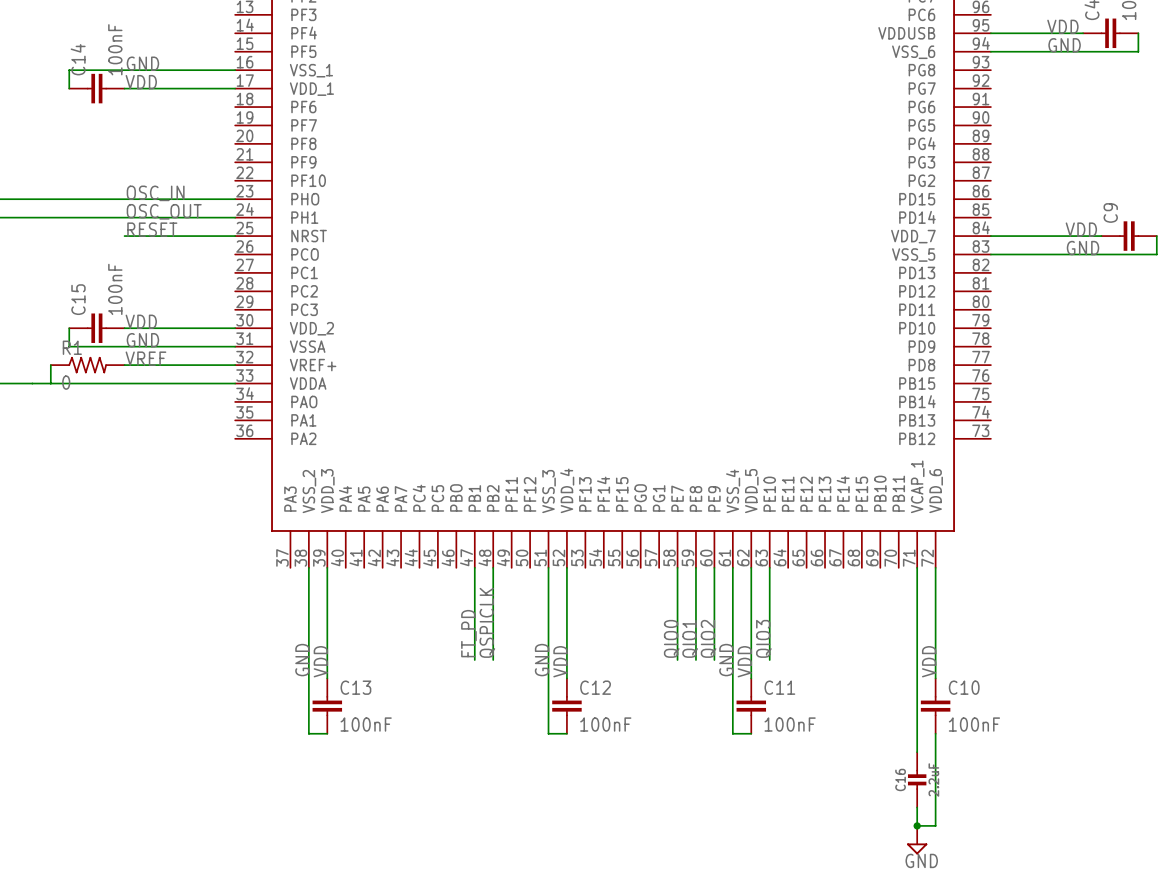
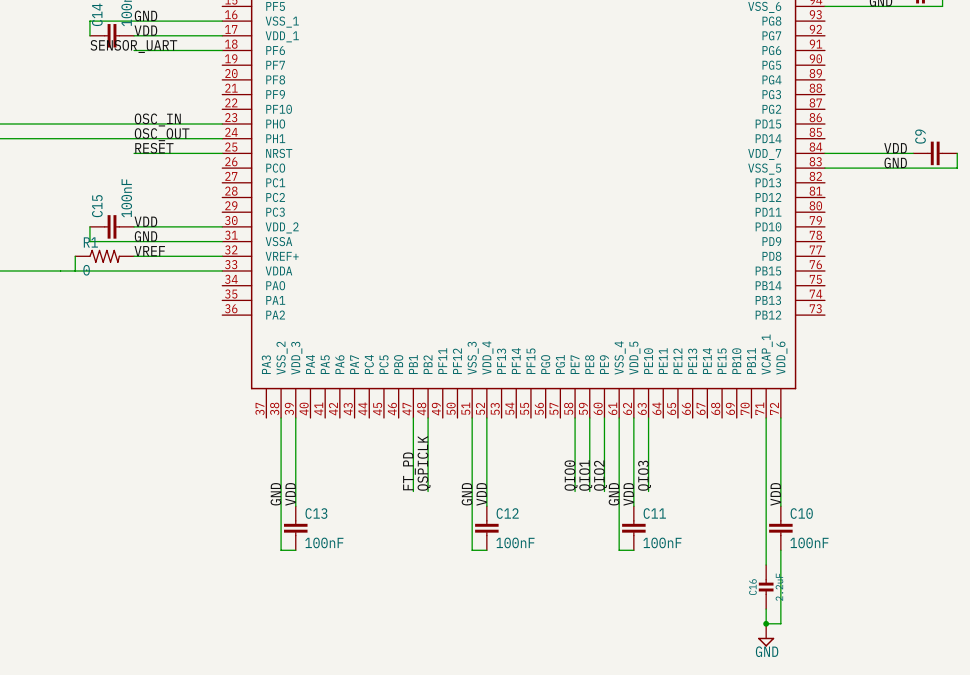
label: none -> SENSOR_UART (133, 46)
wire: none -> (134, 50) (222, 50)

